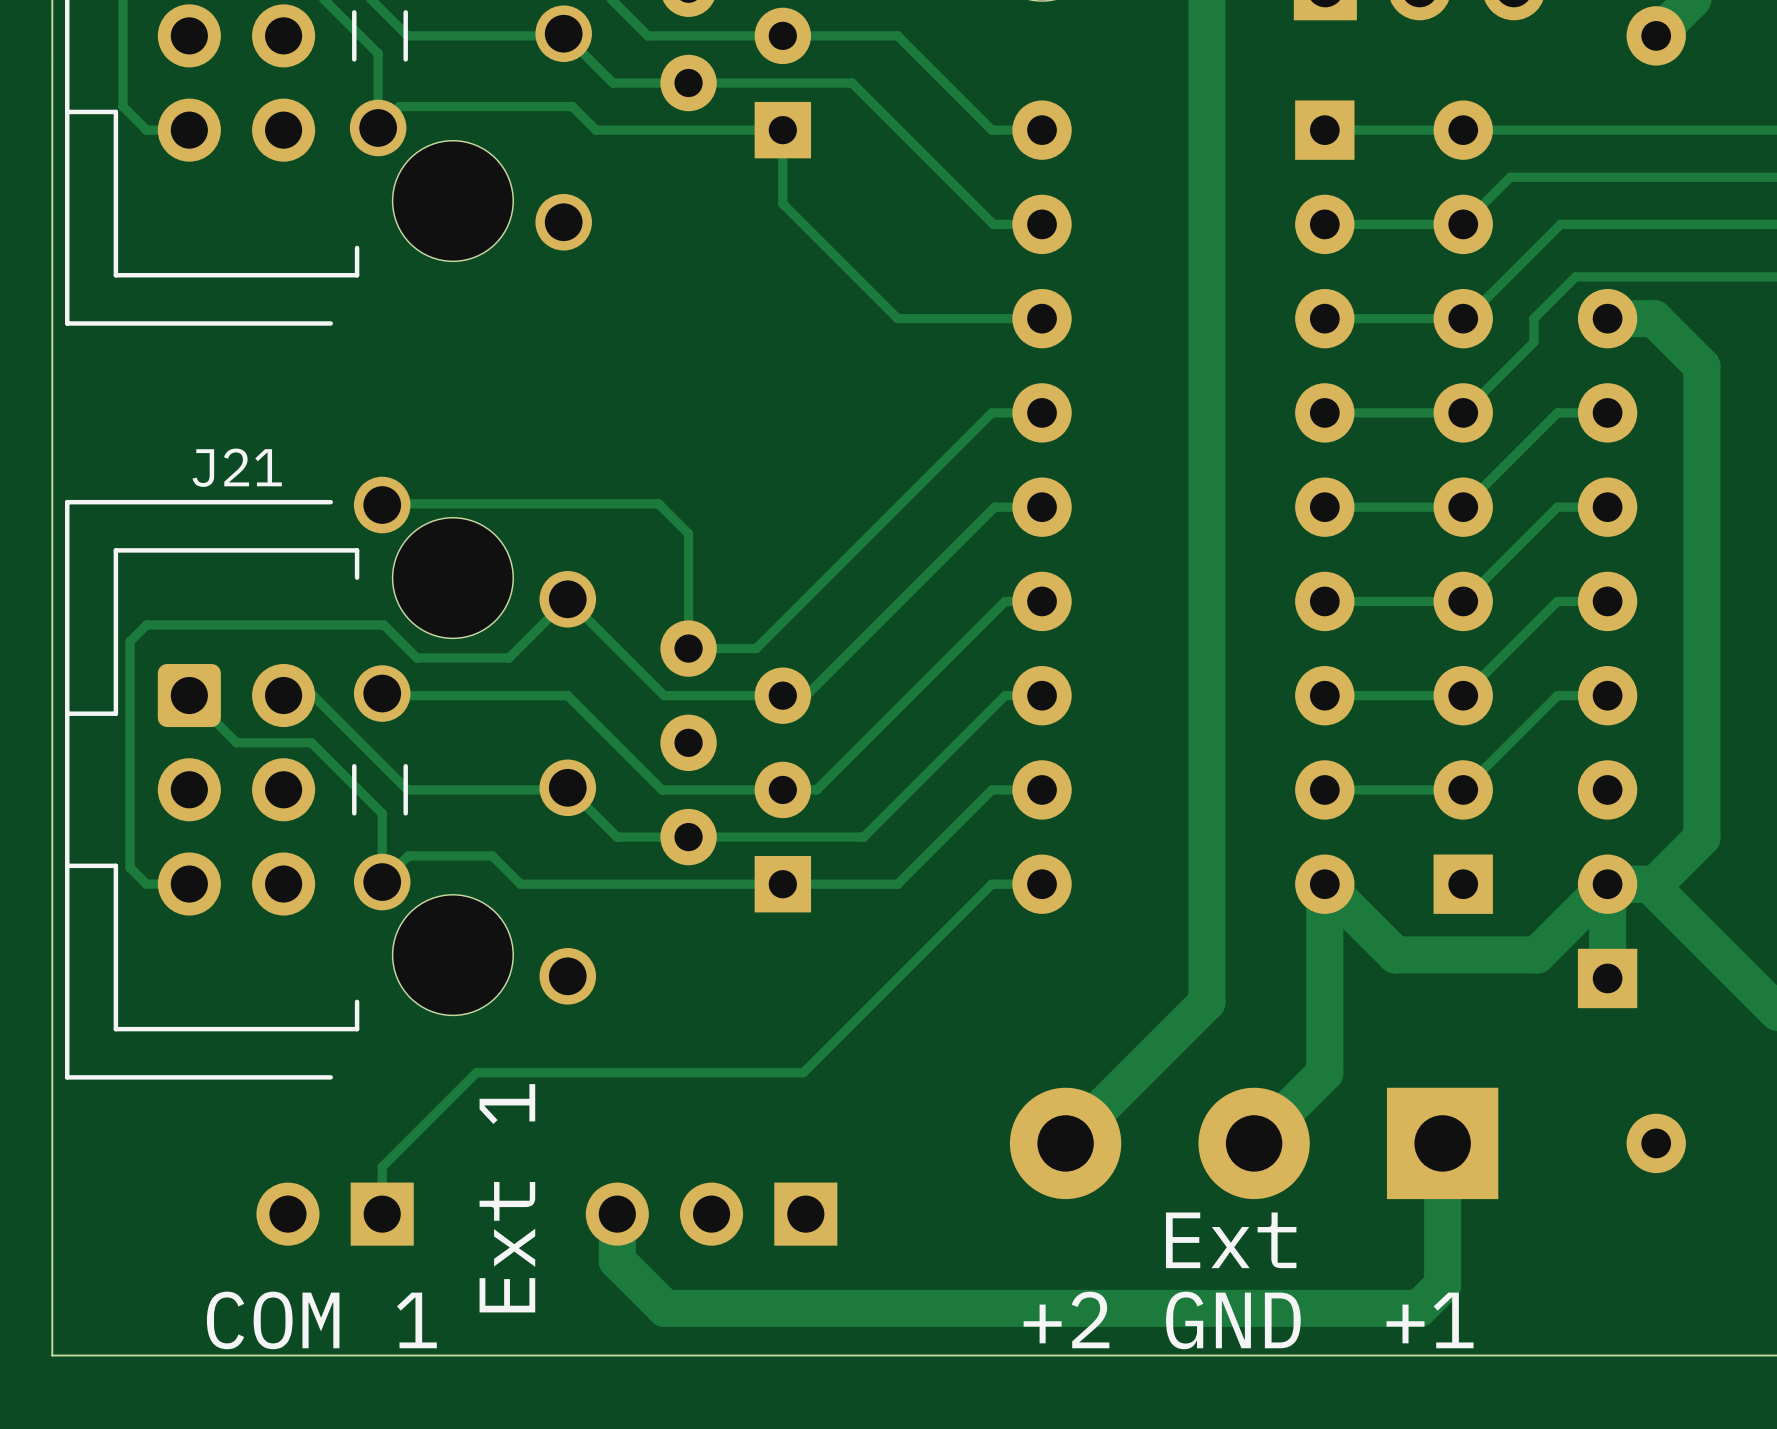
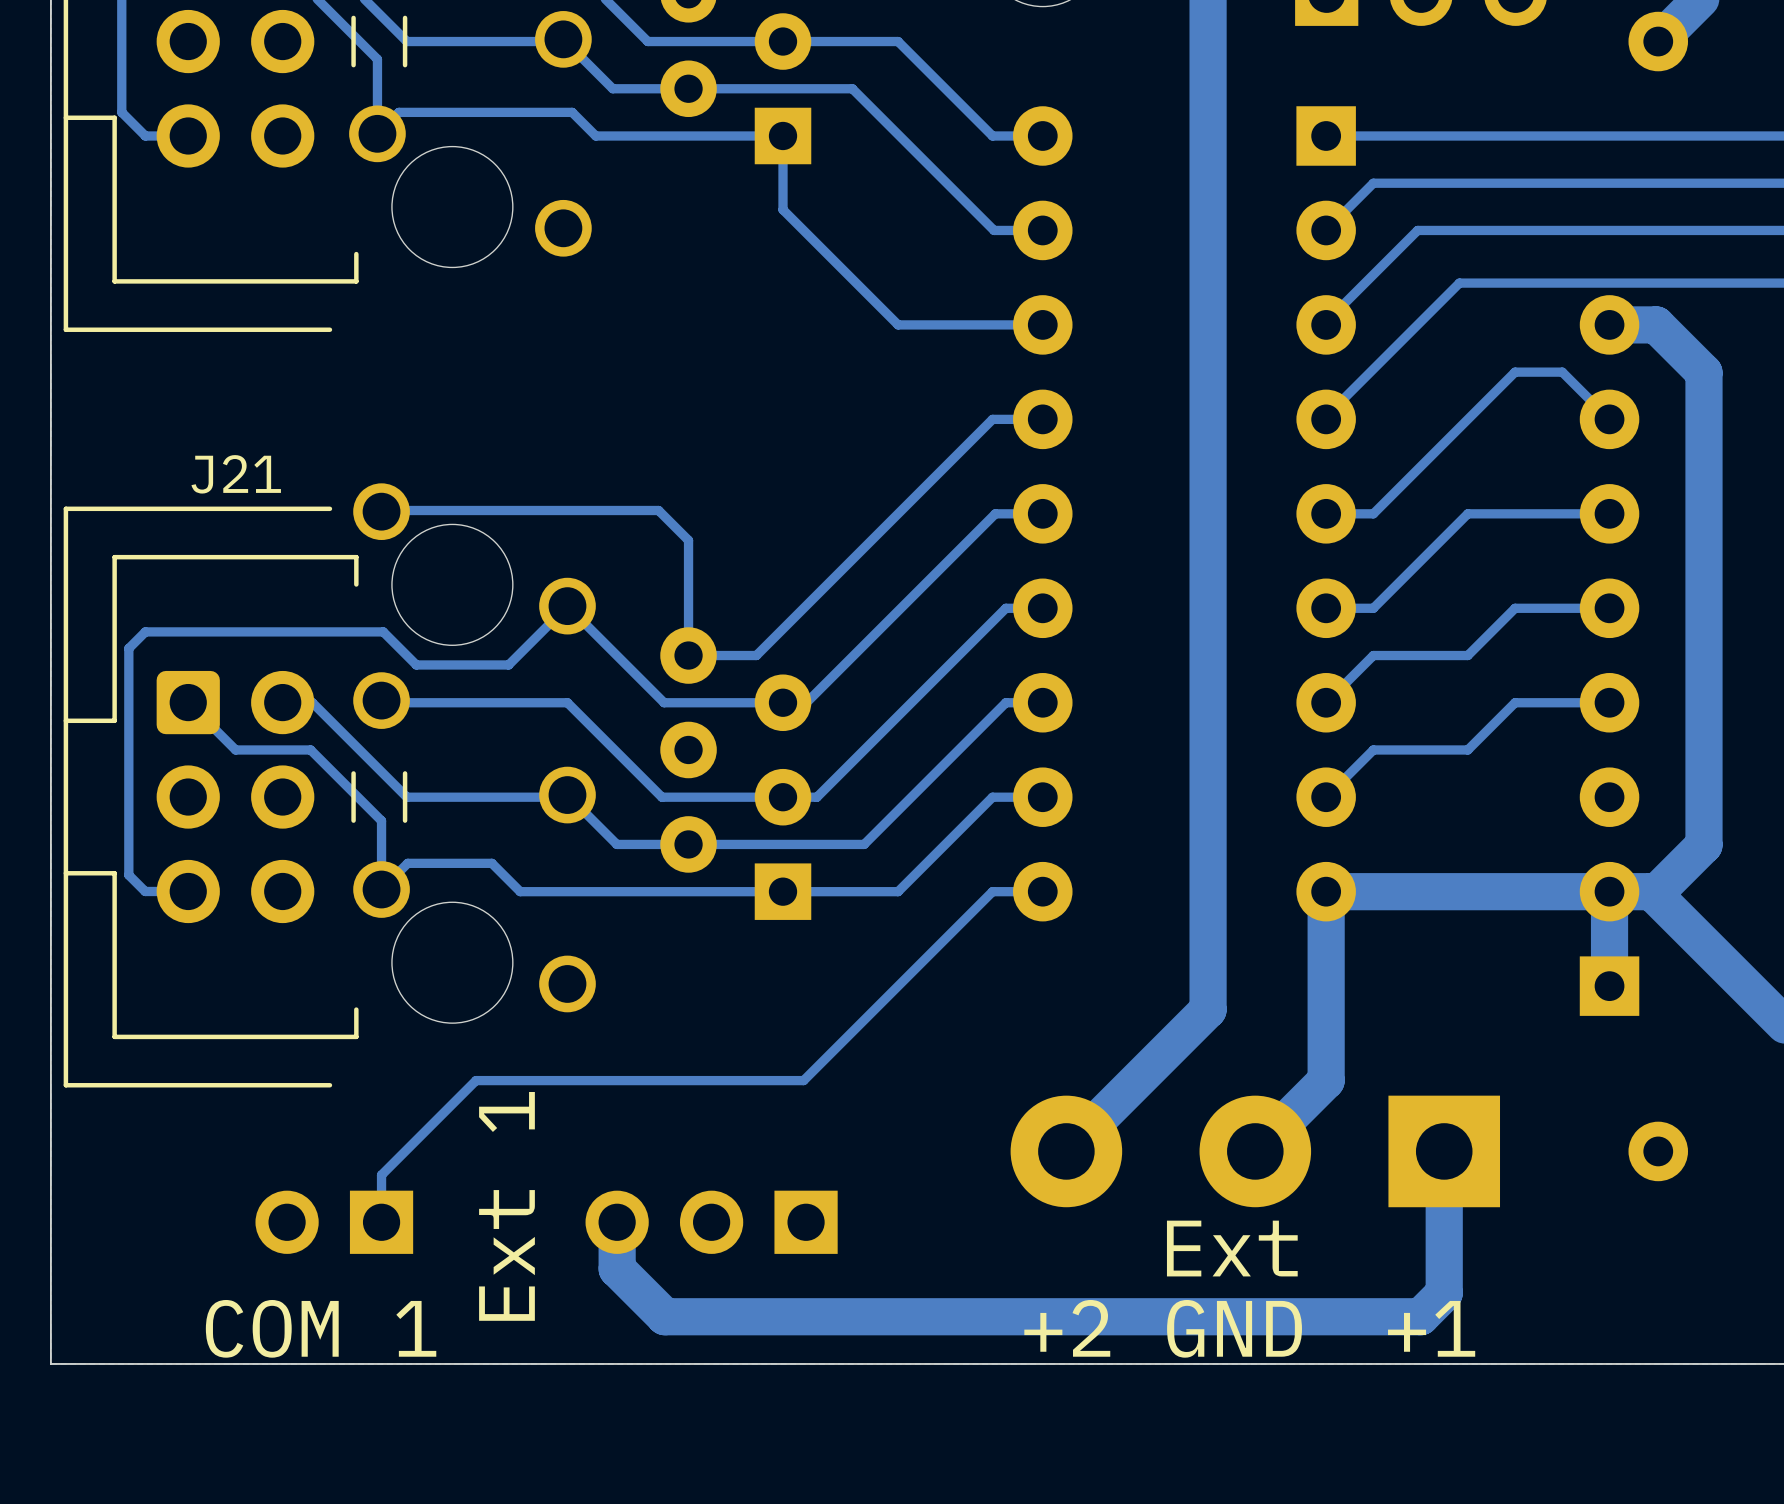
track: (1510, 177) (1463, 224) -> (1562, 230) (1464, 230)
track: none -> (1512, 183) (1373, 183) (1326, 230)
track: (1416, 224) (1324, 224) -> (1417, 230) (1326, 321) (1326, 324)
track: (1560, 224) (1466, 318) (1324, 318) -> none
track: (1575, 276) (1533, 318) (1533, 342) (1463, 412) (1324, 412) -> (1577, 283) (1459, 283) (1326, 416) (1326, 419)
track: (1607, 412) (1557, 412) (1463, 507) (1371, 507) -> (1609, 419) (1562, 372) (1515, 372) (1373, 513)
part: (1463, 507) -> none
track: (1557, 507) (1463, 601) (1371, 601) -> (1559, 513) (1467, 513) (1373, 608)
track: (1557, 601) (1463, 695) (1324, 695) -> (1559, 608) (1515, 608) (1467, 655) (1373, 655) (1326, 702)
track: (1557, 695) (1463, 789) (1324, 789) -> (1559, 702) (1515, 702) (1467, 749) (1373, 749) (1326, 797)
track: (1607, 884) (1536, 954) (1395, 954) (1324, 884) -> (1609, 891) (1326, 891)

